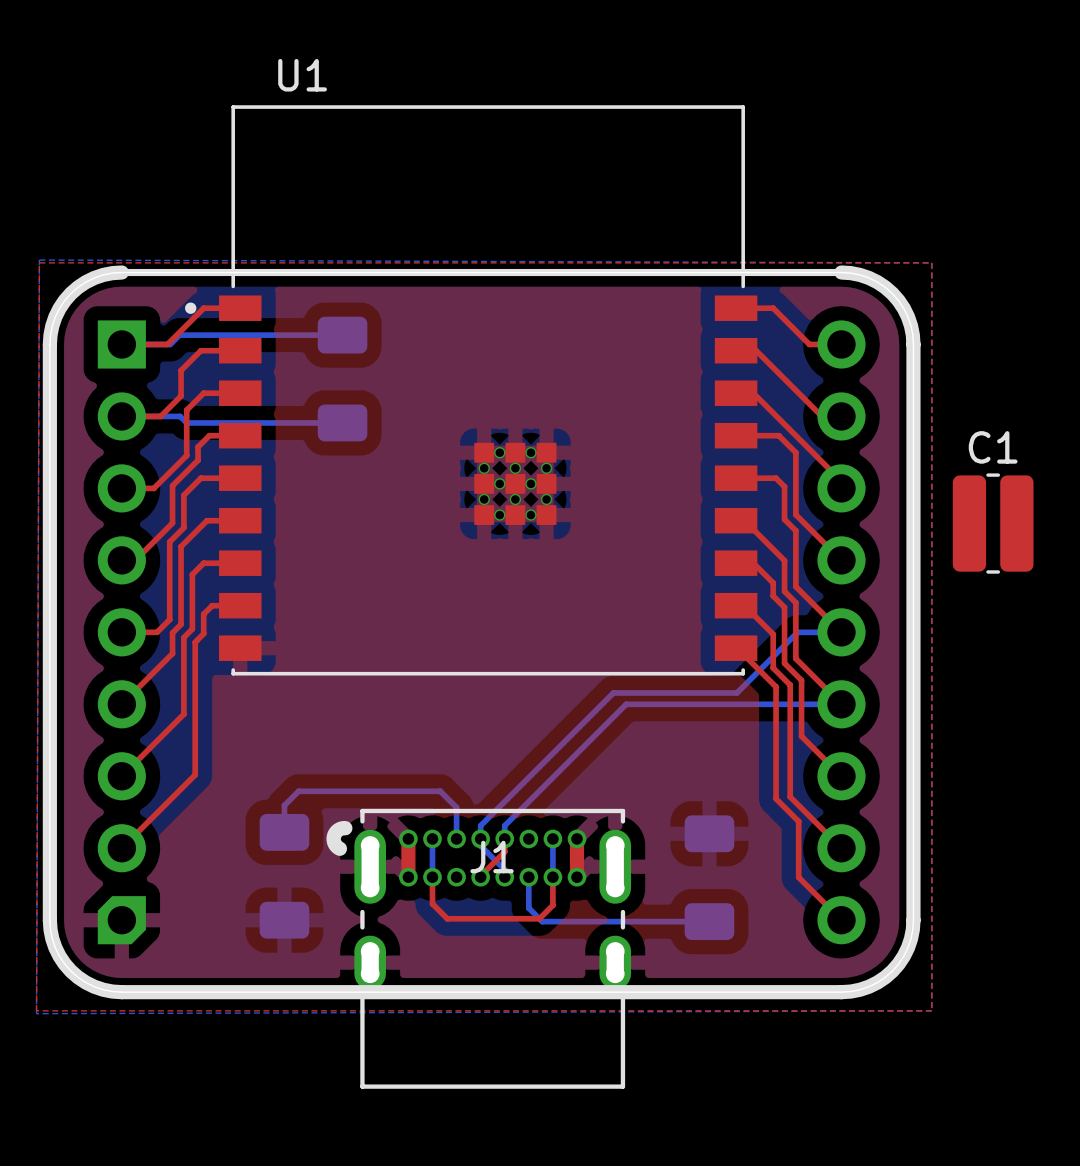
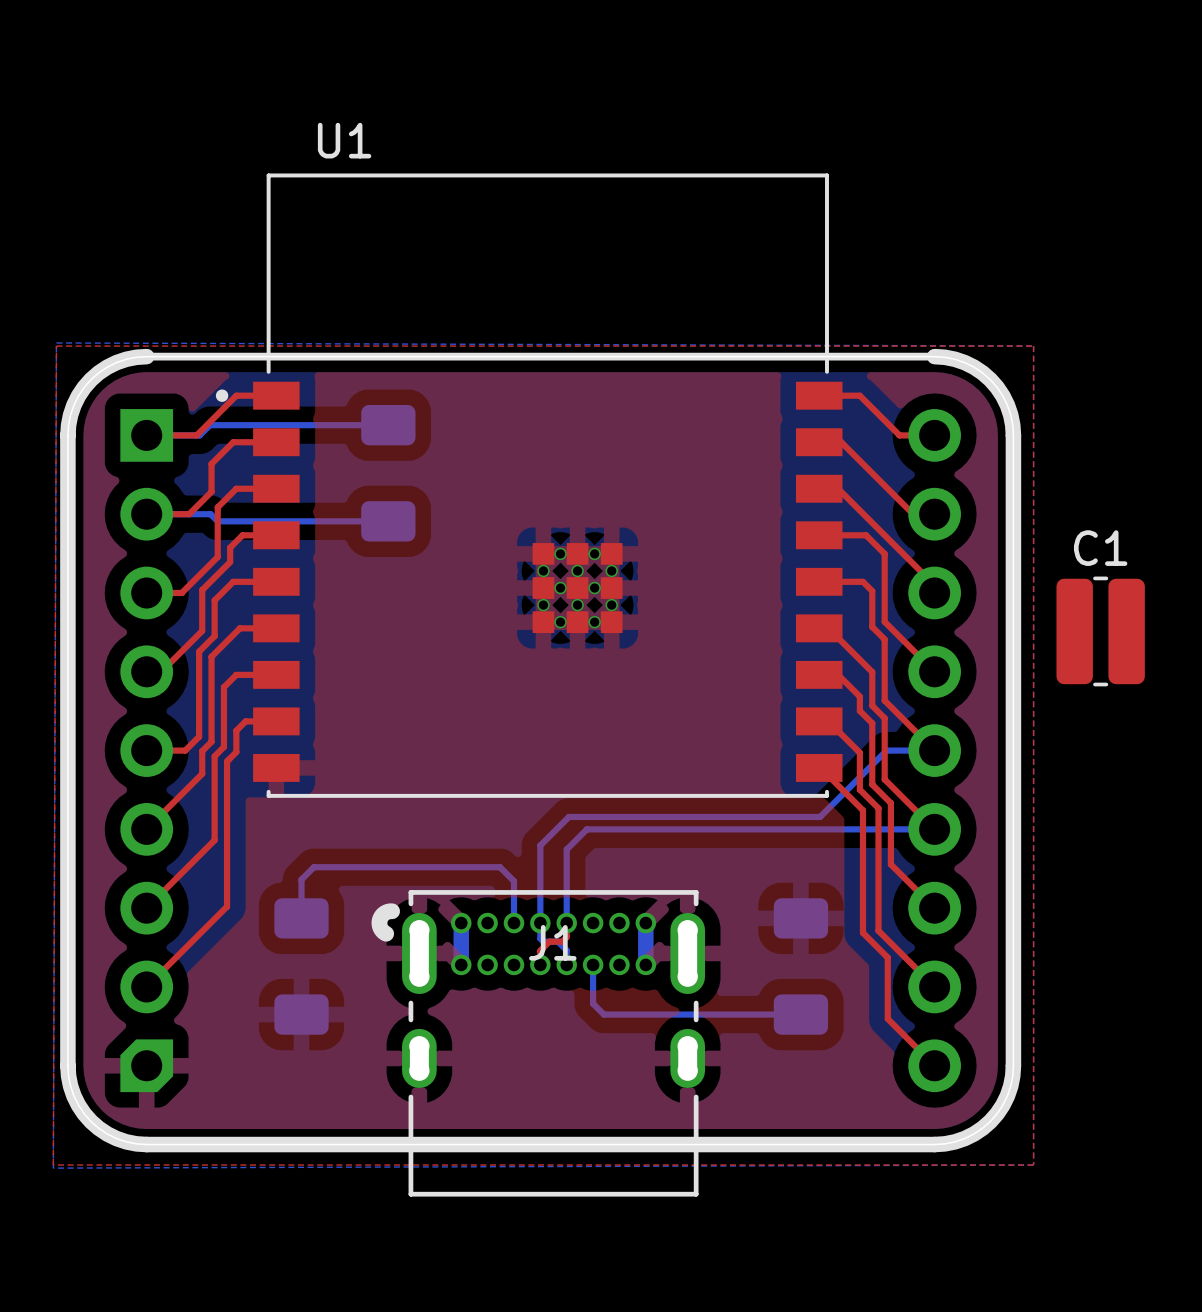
bottom track: (613, 692) (480, 825) (480, 845) (504, 869) (504, 877) -> (684, 816) (568, 816) (540, 845) (540, 938) (543, 941) (557, 941) (566, 950) (566, 964)
bottom track: (626, 704) (504, 825) (504, 838) -> (698, 829) (586, 829) (566, 849) (566, 923)
bottom track: none -> (301, 918) (301, 879) (313, 867) (500, 867) (513, 881) (513, 923)
top track: none -> (566, 923) (566, 937) (562, 941) (549, 941) (540, 950) (540, 964)
bottom track: none -> (593, 964) (593, 1003) (603, 1014) (800, 1014)
bottom track: (284, 832) (284, 805) (298, 791) (440, 791) (456, 807) (456, 838) -> none
top track: (408, 838) (408, 877) -> none
bottom track: (432, 838) (432, 877) -> (461, 923) (461, 964)
top track: (504, 838) (504, 851) (480, 877) -> none
bottom track: (552, 838) (552, 877) -> (645, 923) (645, 964)
top track: (576, 838) (576, 877) -> none
part position: (284, 876) -> (301, 966)
top track: (432, 877) (432, 903) (447, 918) (539, 918) (552, 905) (552, 877) -> none
bottom track: (528, 877) (528, 908) (542, 921) (709, 921) -> none
part position: (709, 877) -> (800, 966)
J1 position: (478, 948) -> (538, 1043)

